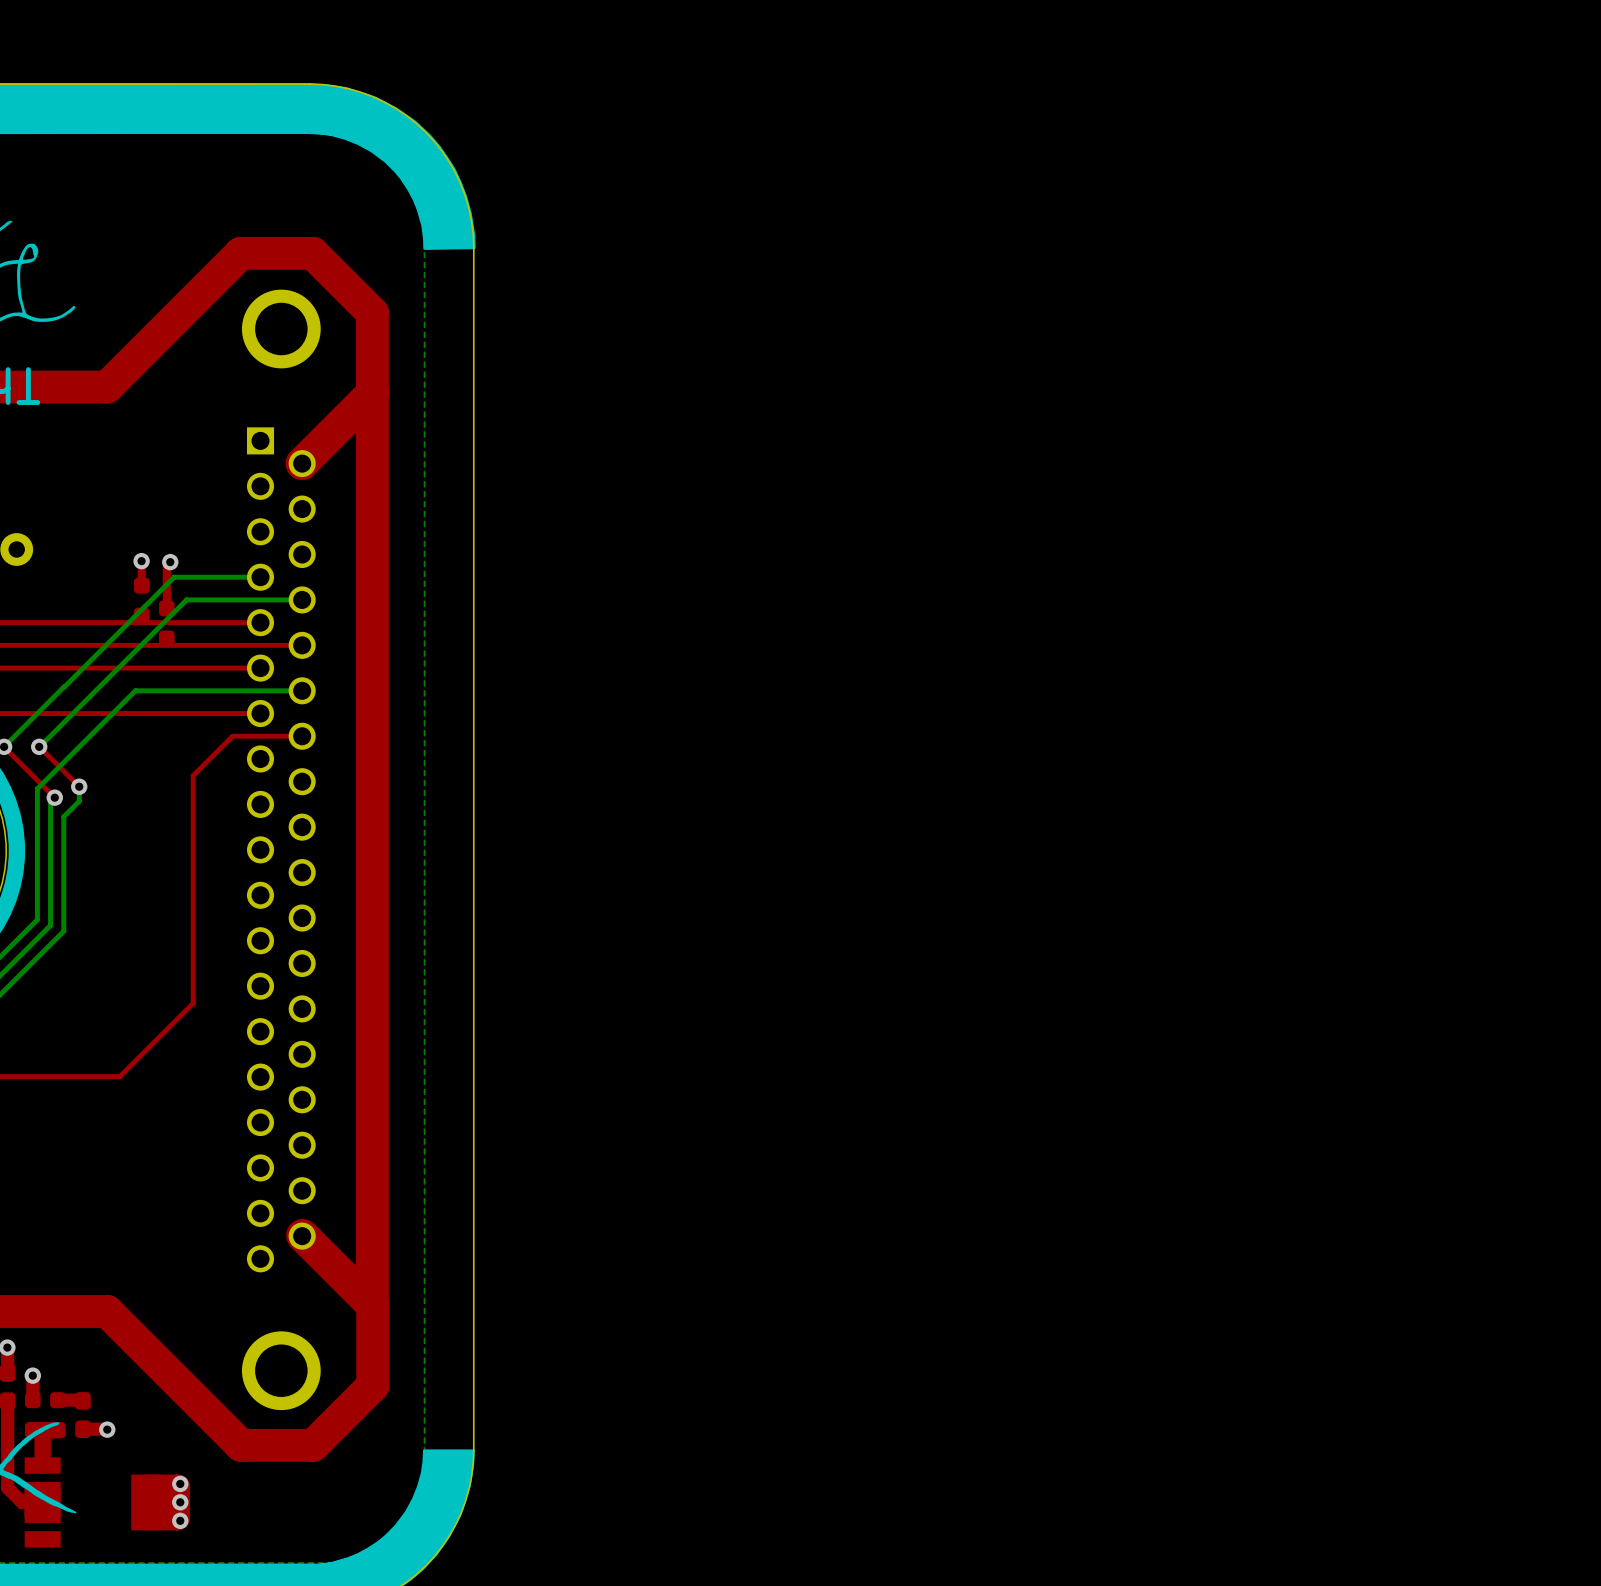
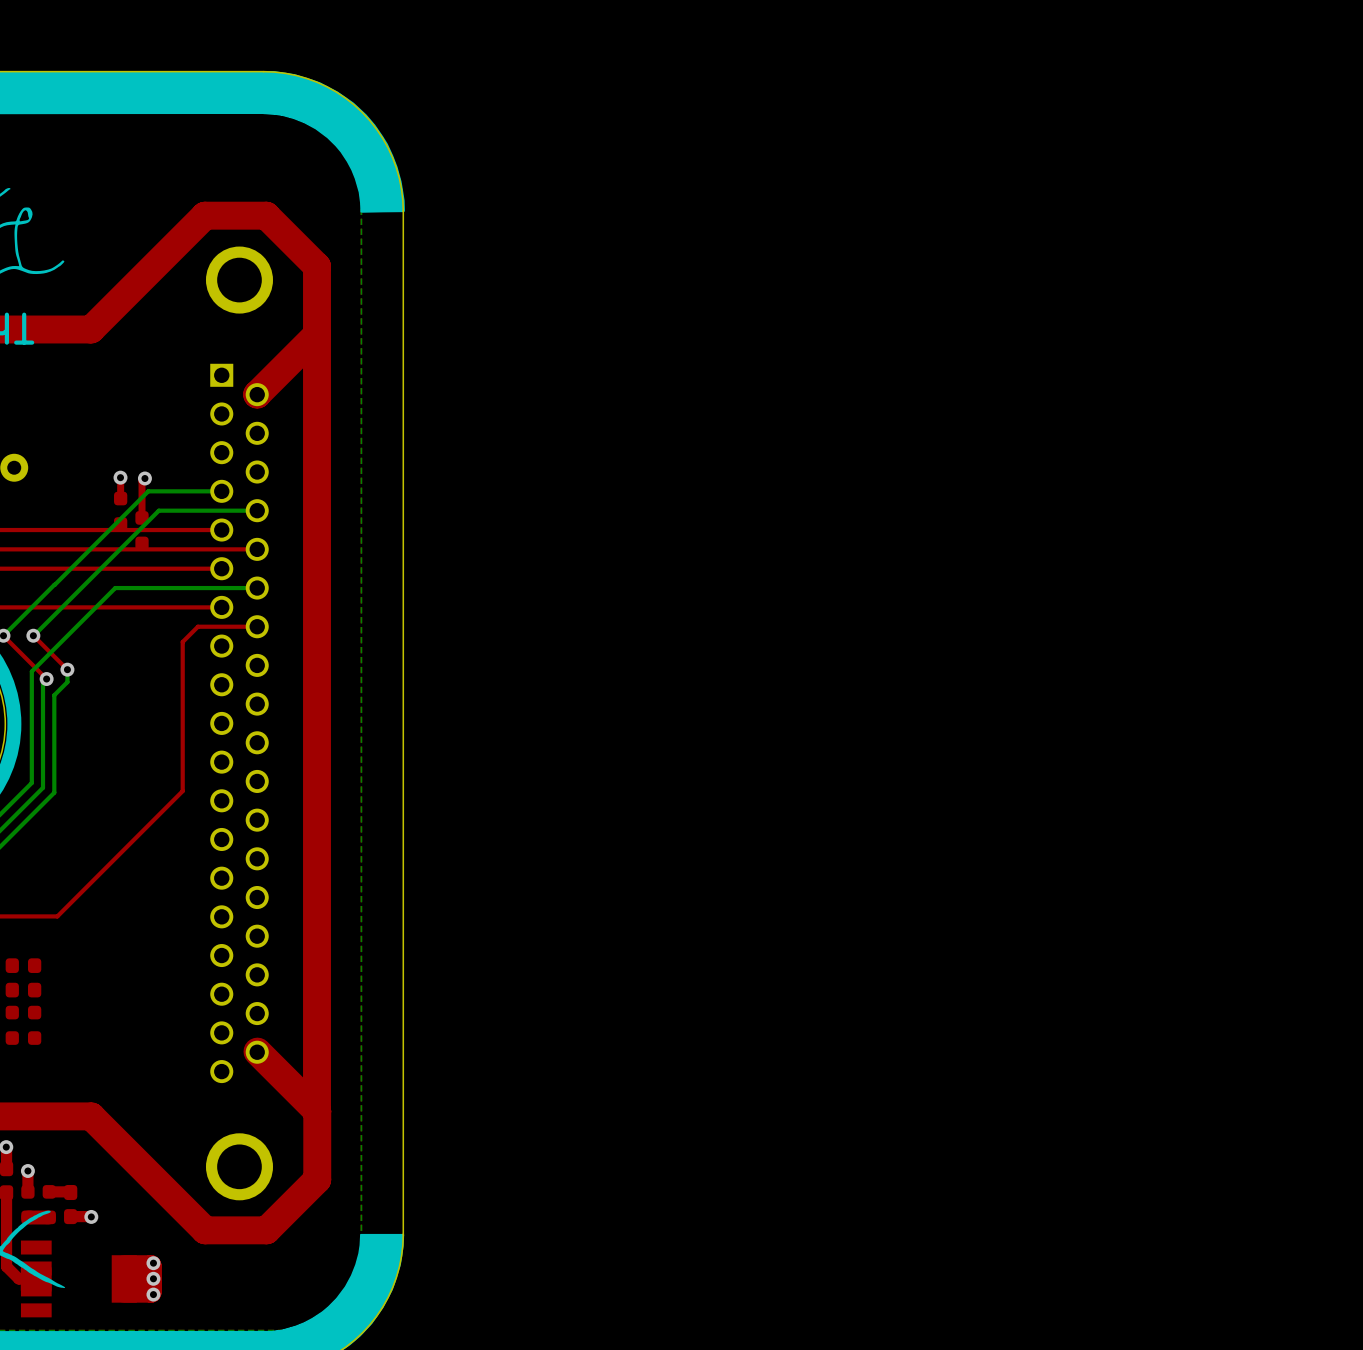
top track: (214, 754) (193, 775) (193, 1003) (119, 1076) (67, 1076) -> (182, 641) (182, 791) (57, 916)
part: none -> (12, 977)
part: none -> (34, 977)
part: none -> (12, 1025)
part: none -> (34, 1025)
top track: (43, 1430) (42, 1465) -> none

